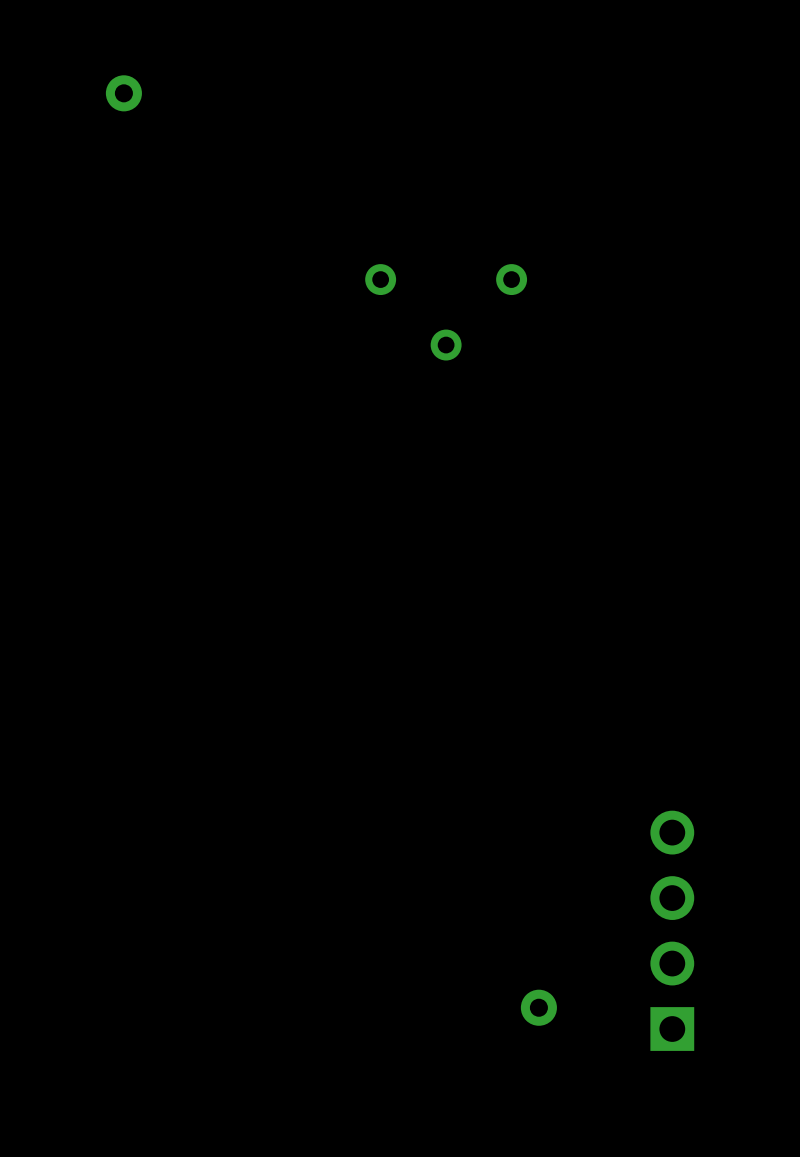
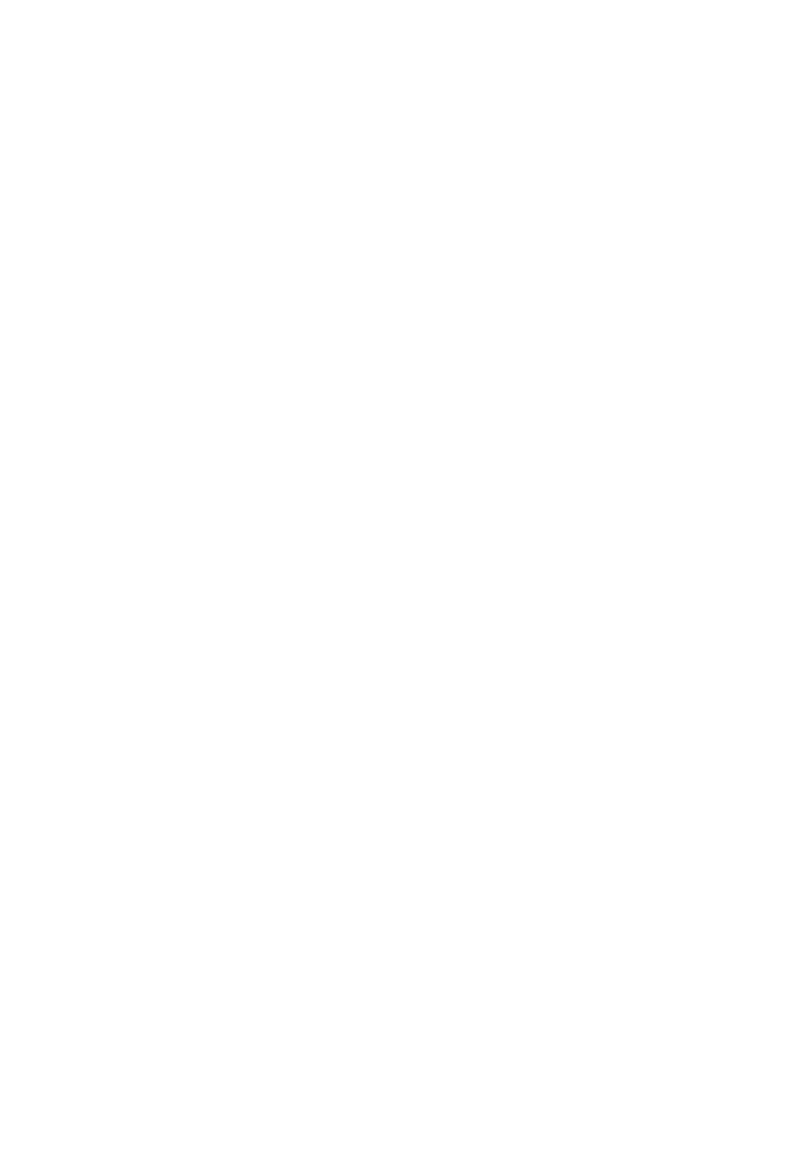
part: (123, 93) -> none
part: (446, 312) -> none
part: (672, 930) -> none
part: (538, 1007) -> none

